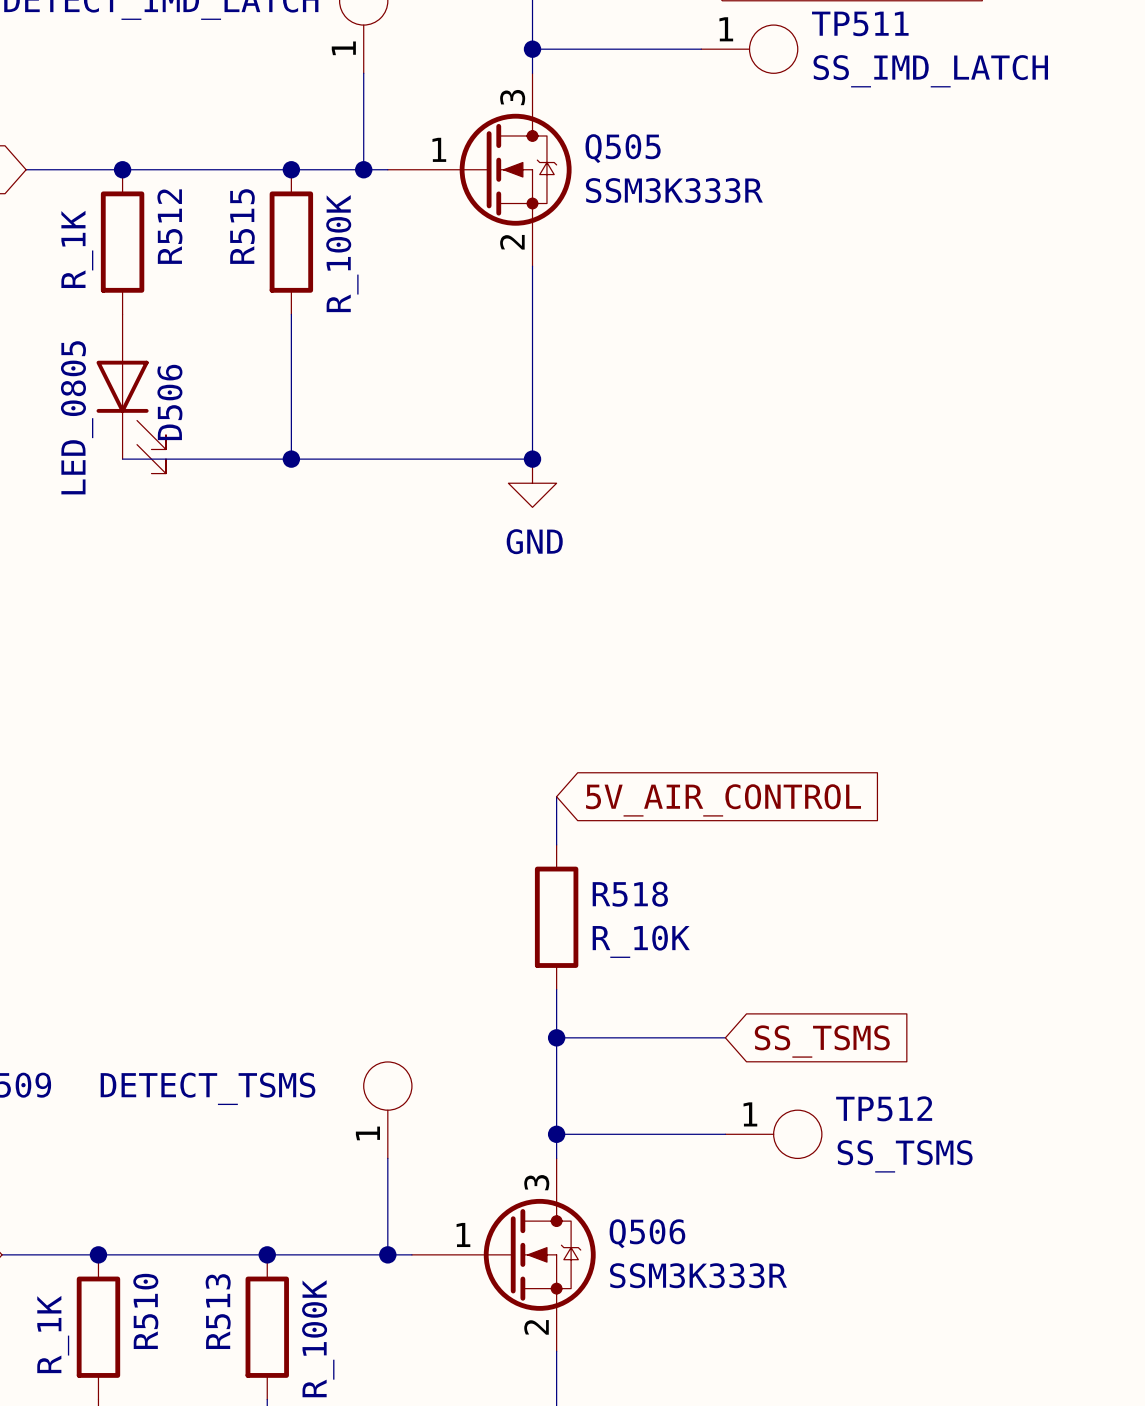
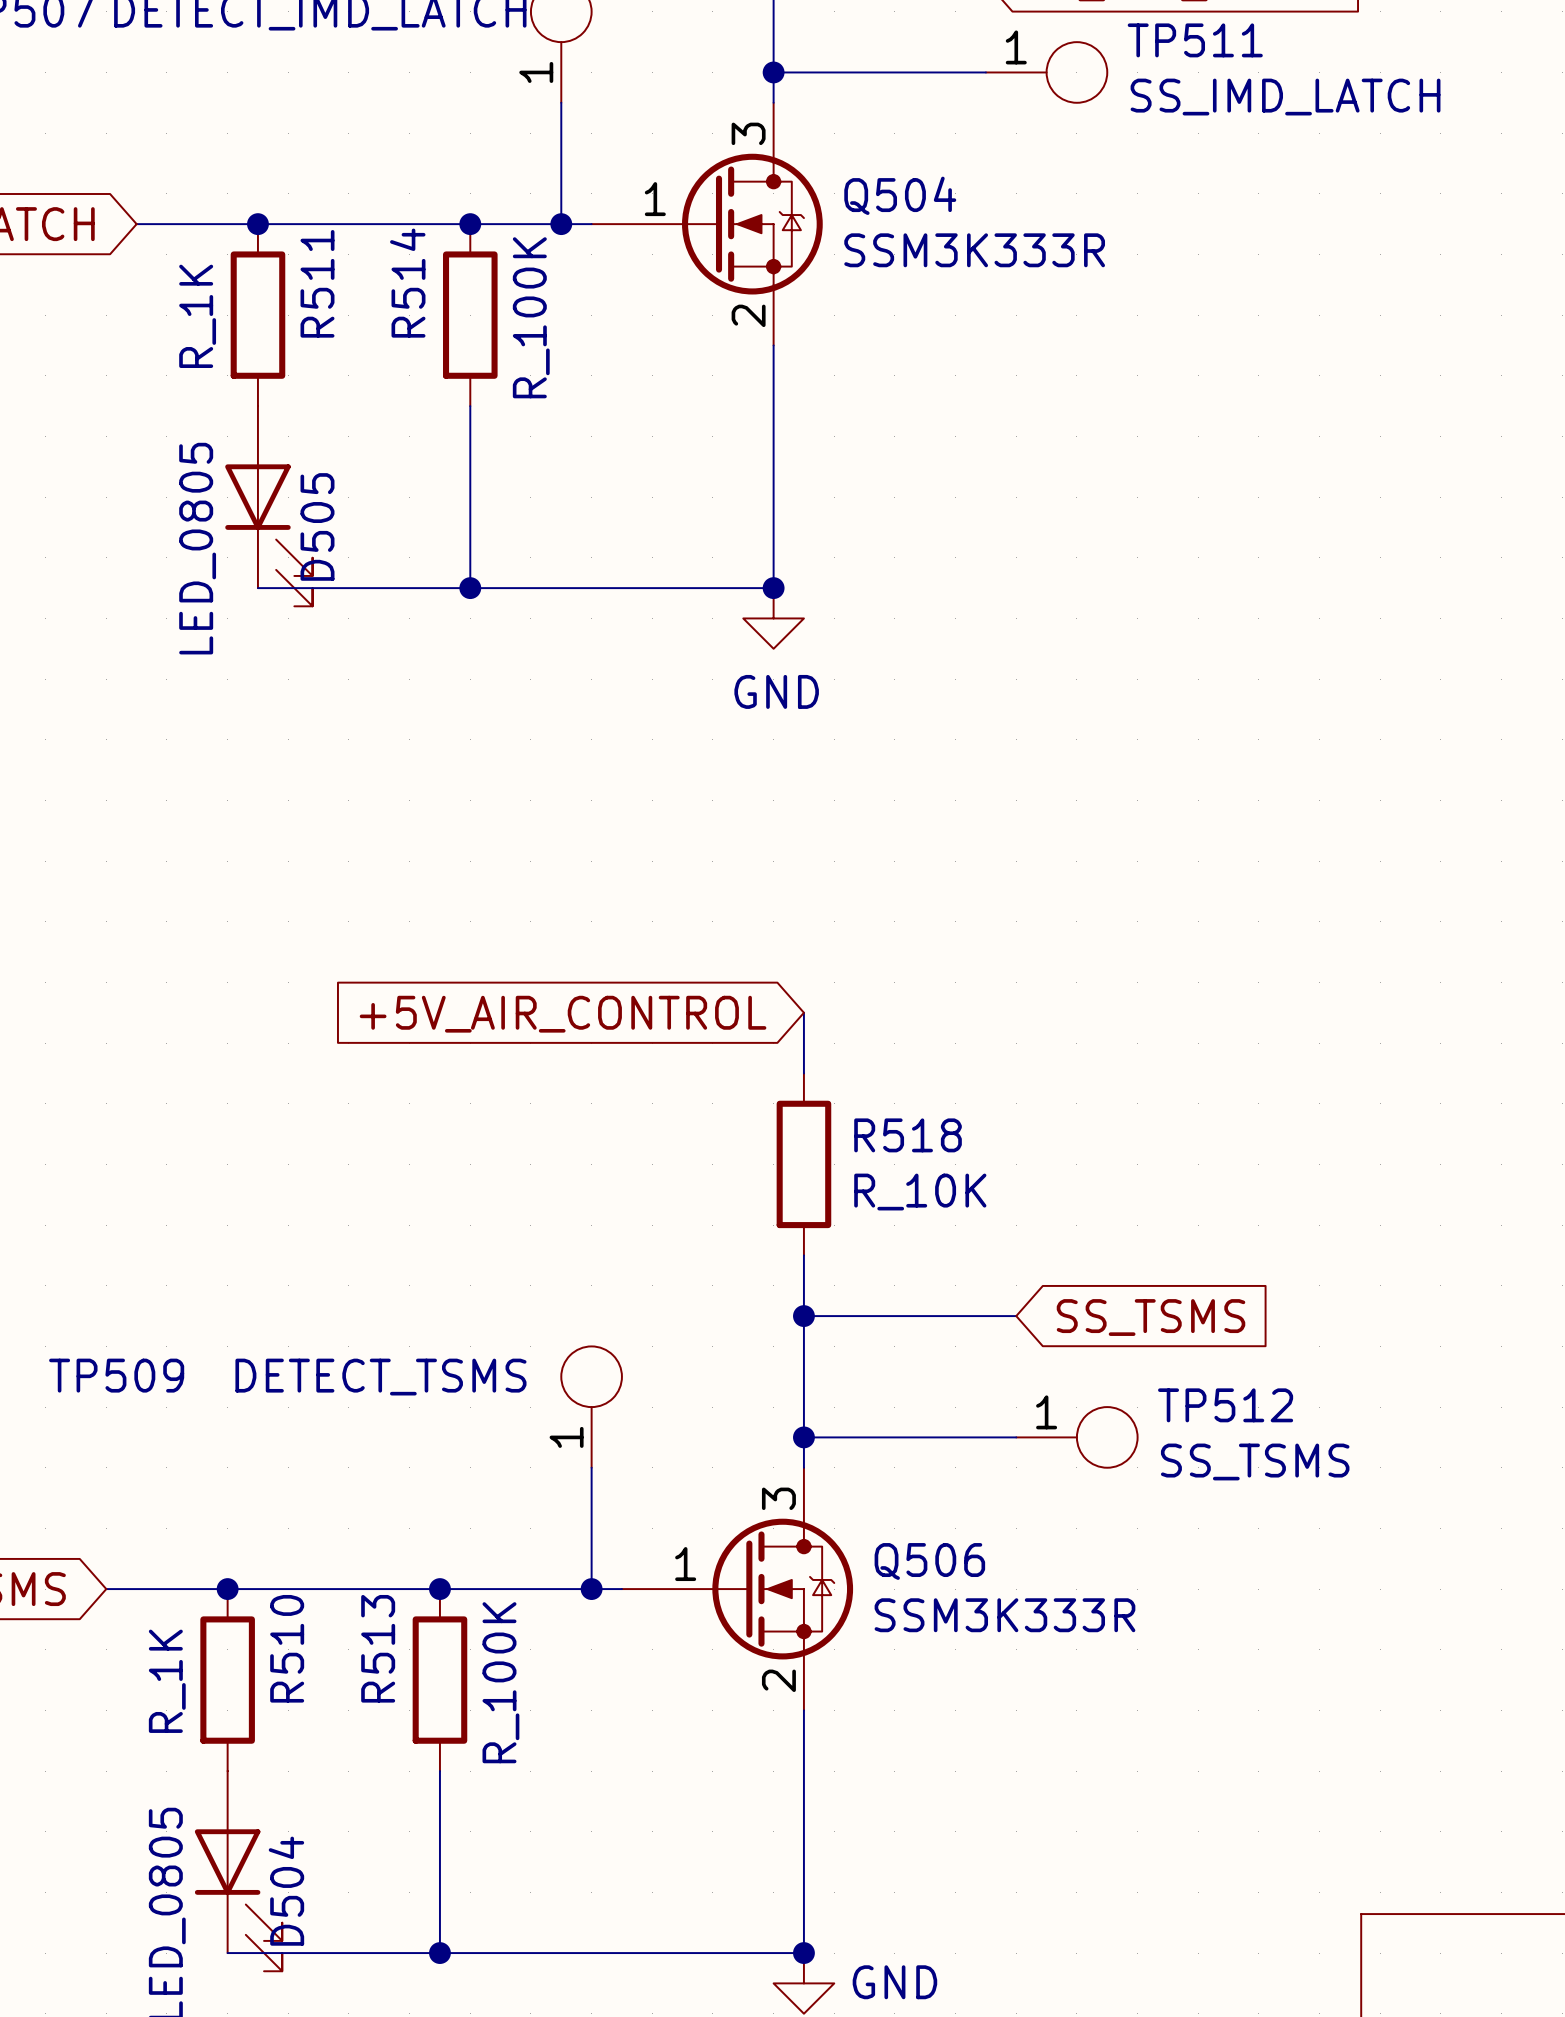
Q505 name: Q505 (623, 148) -> Q504 (900, 195)
R512 name: R512 (169, 226) -> R511 (317, 283)
R515 name: R515 (242, 226) -> R514 (407, 283)
D506 name: D506 (169, 402) -> D505 (317, 526)
global label: 5V_AIR_CONTROL (723, 800) -> +5V_AIR_CONTROL (563, 1014)

